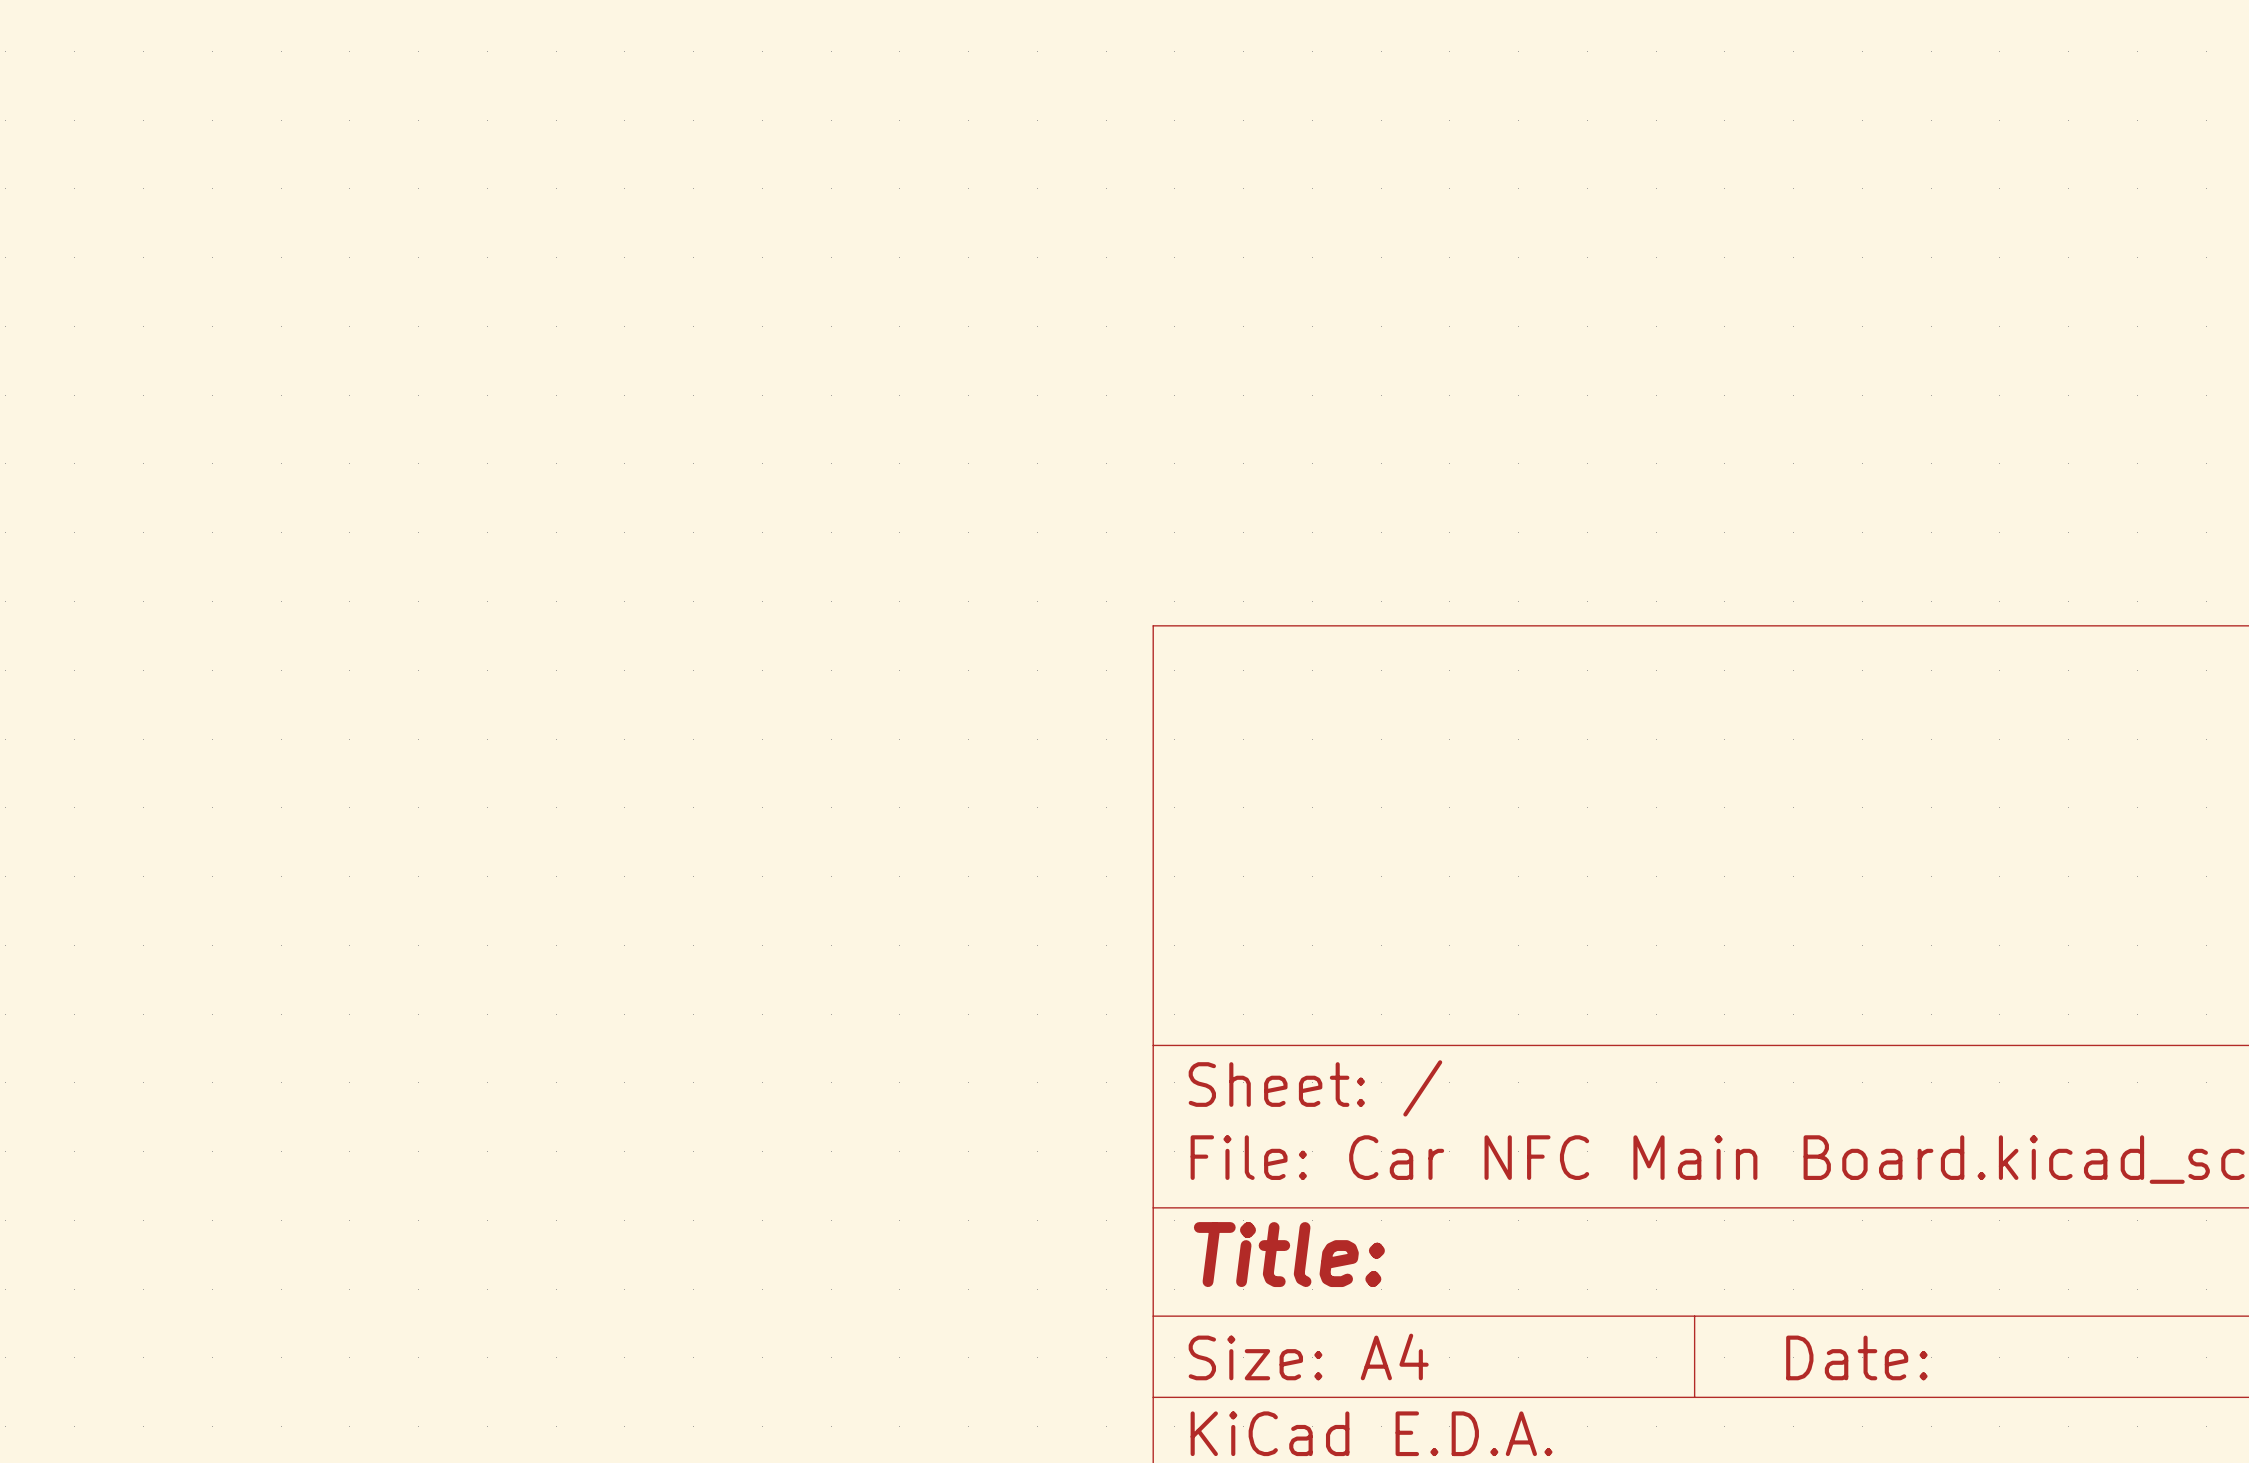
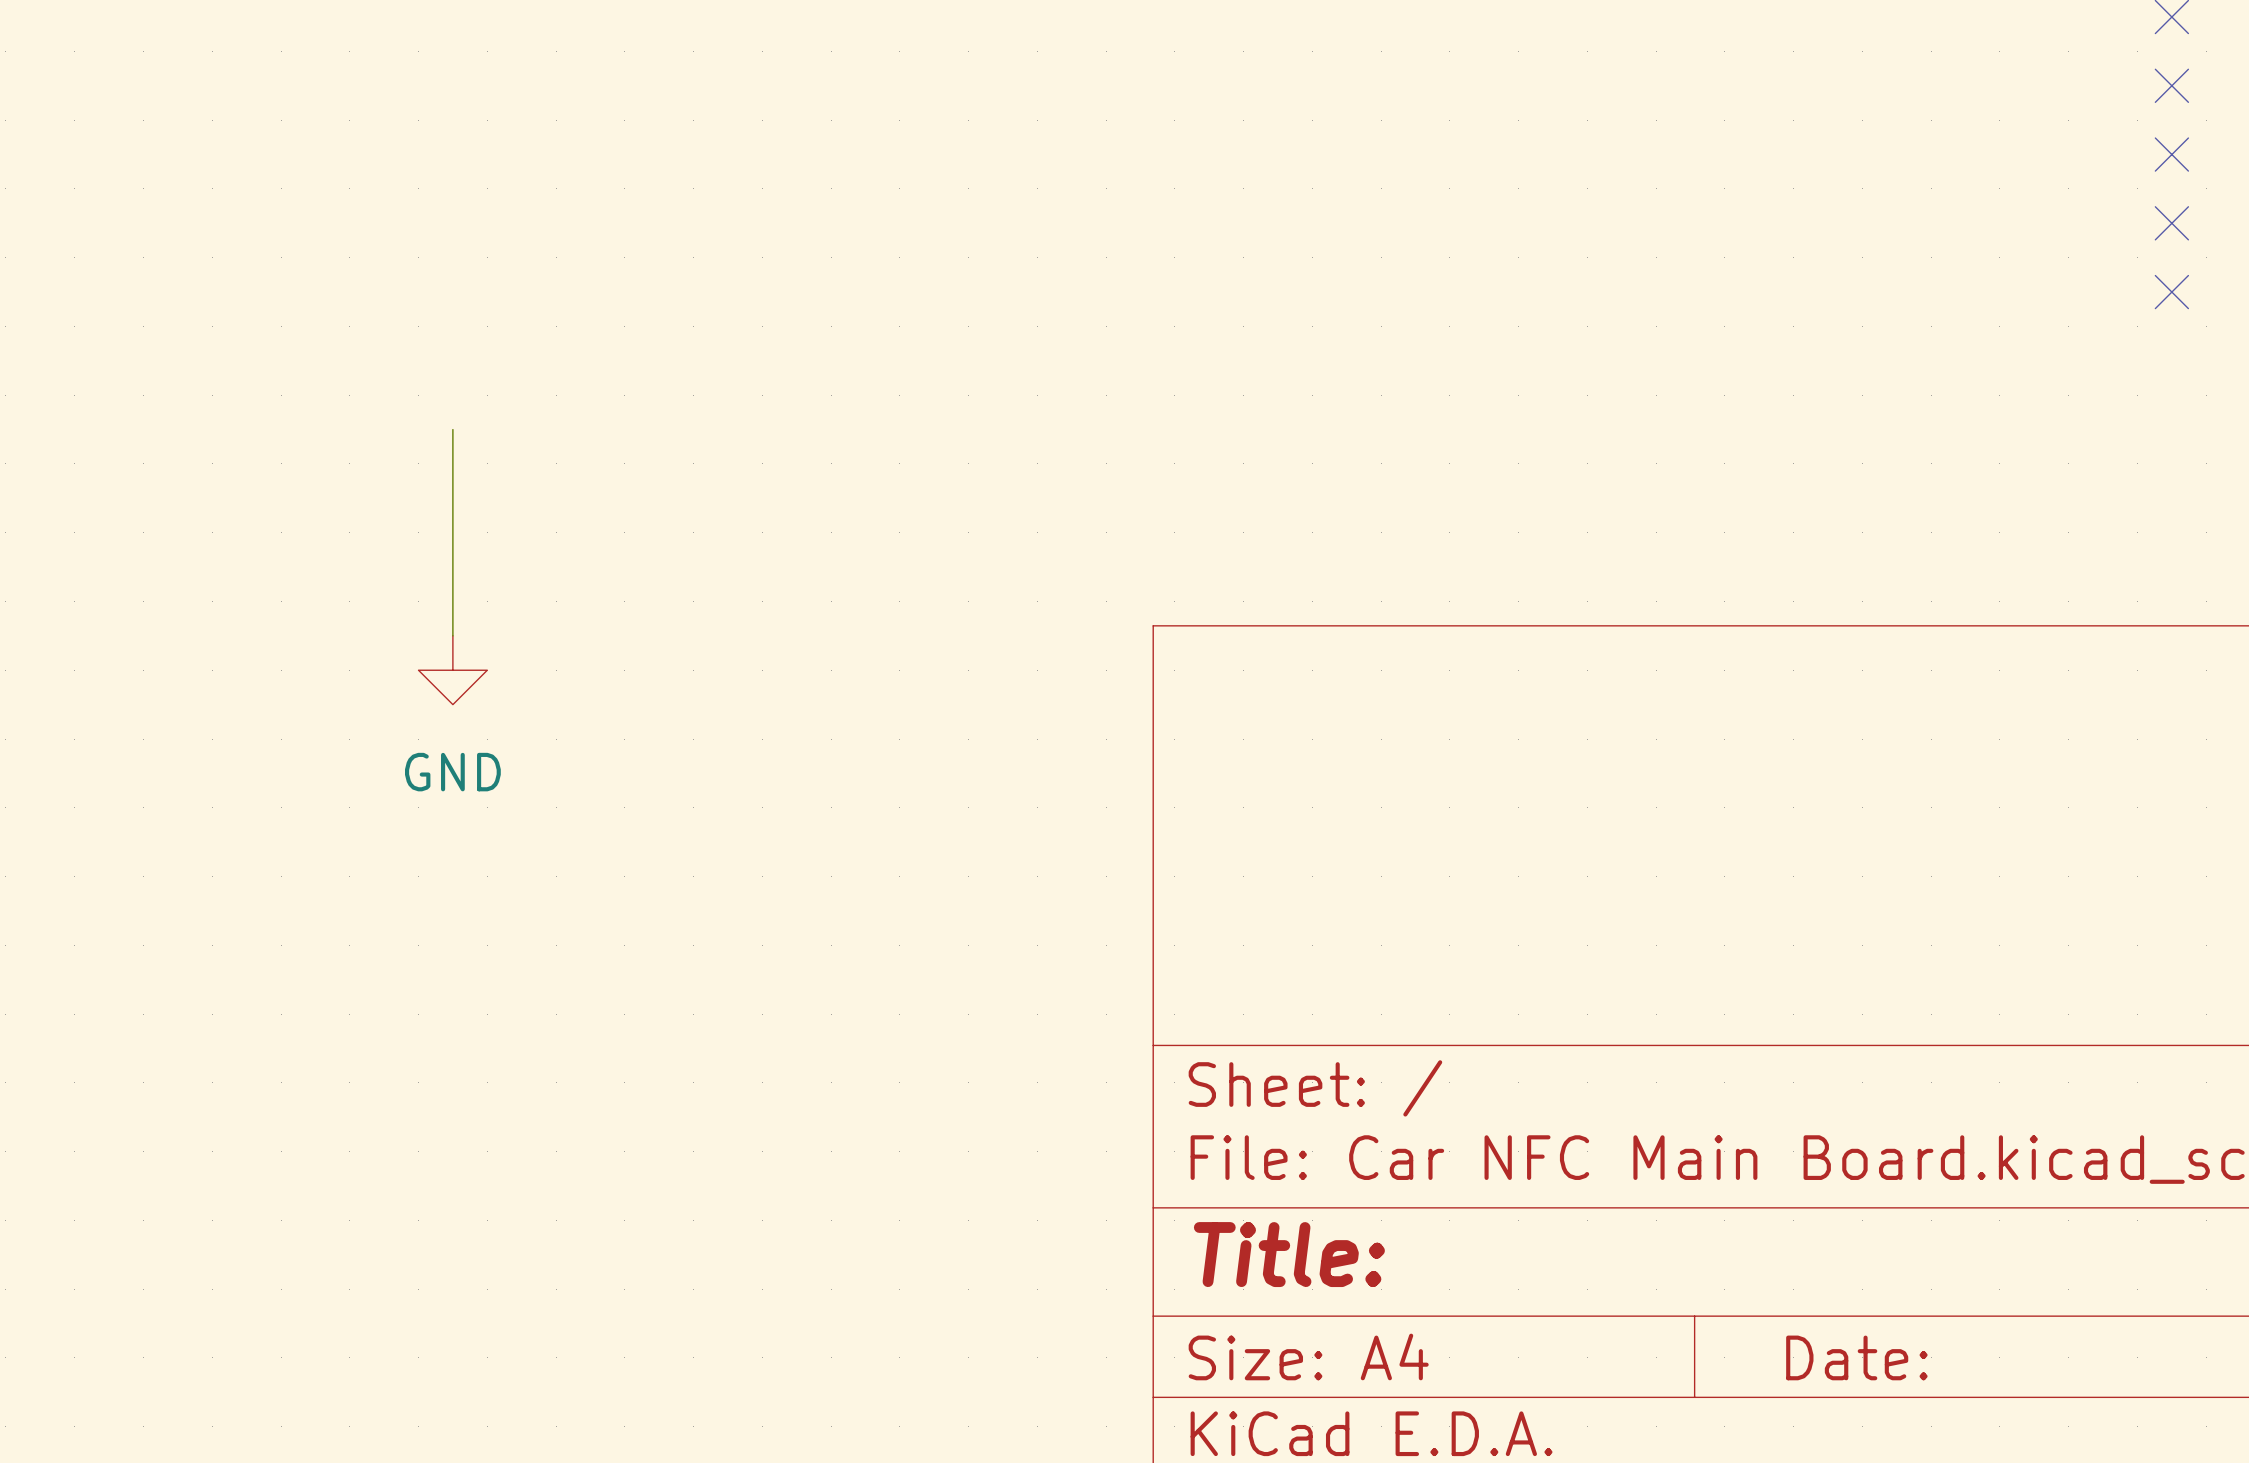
no-connect mark: none -> (2171, 17)
no-connect mark: none -> (2171, 85)
no-connect mark: none -> (2171, 154)
no-connect mark: none -> (2171, 223)
no-connect mark: none -> (2171, 292)
wire: none -> (452, 429) (452, 635)
power symbol: none -> GND (452, 670)

